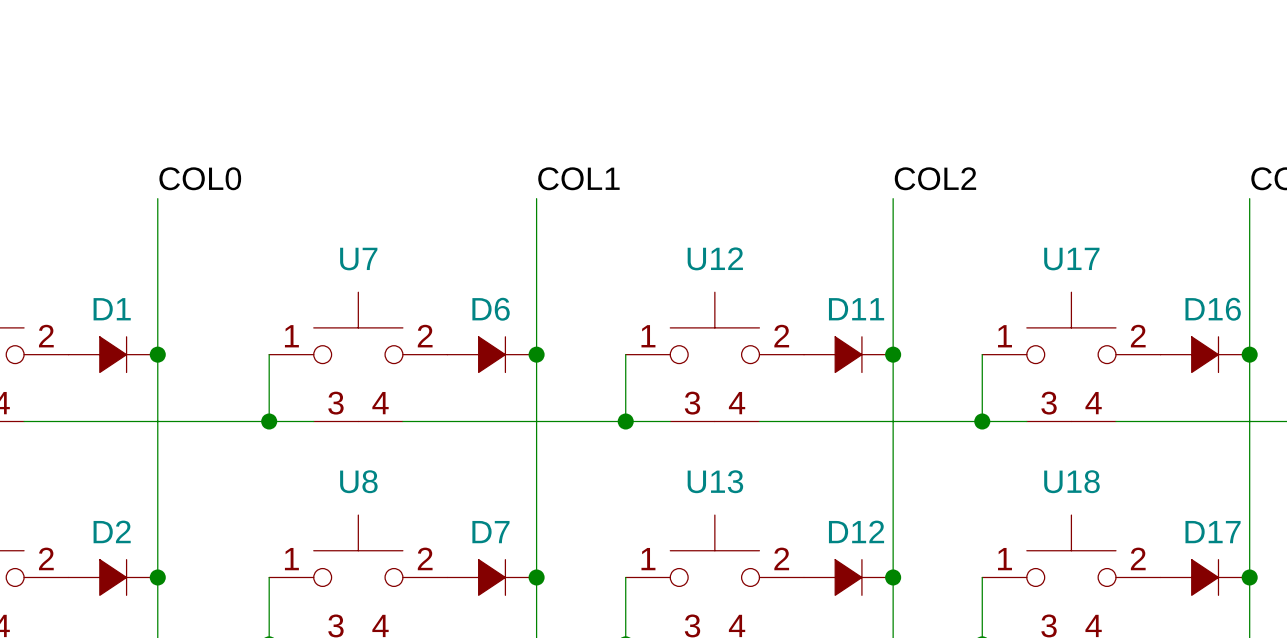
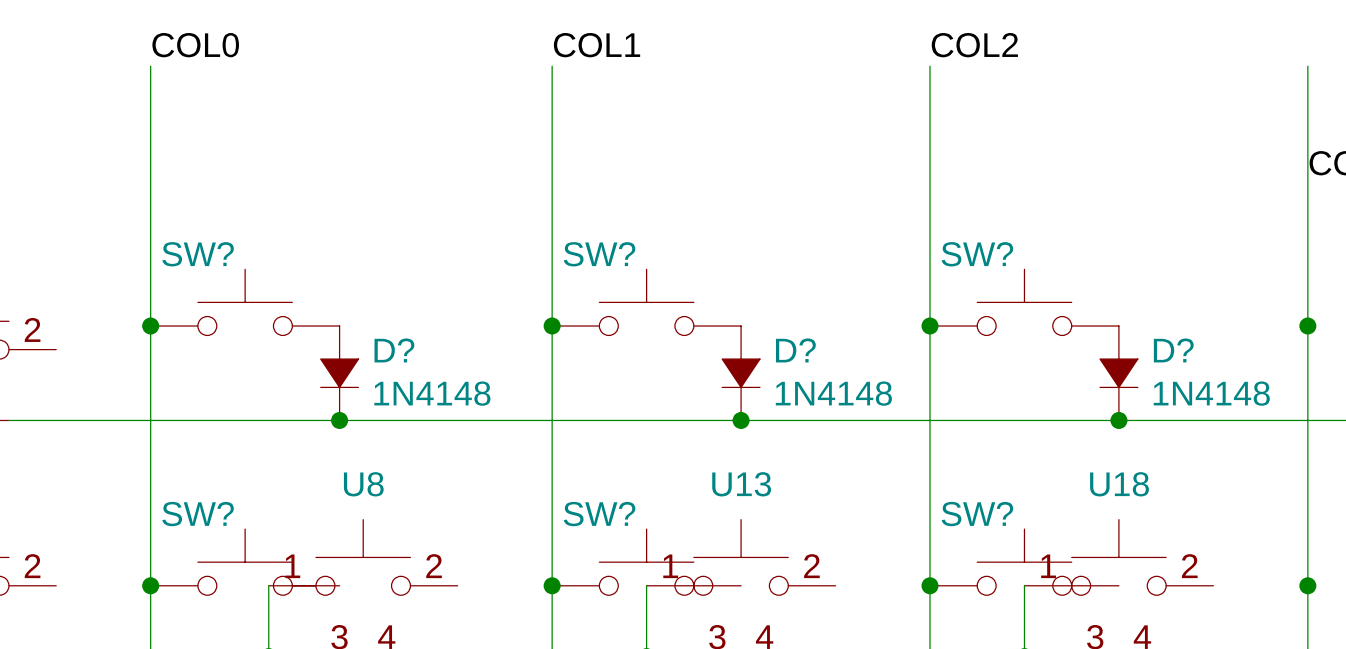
wire: none -> (150, 66) (150, 184)
wire: none -> (552, 66) (552, 184)
wire: none -> (930, 66) (930, 184)
wire: none -> (1307, 66) (1307, 184)
label position: COL0 (200, 178) -> COL0 (195, 45)
label position: COL1 (578, 178) -> COL1 (597, 45)
label position: COL2 (935, 178) -> COL2 (974, 45)
SW?: none -> (245, 302)
SW?: none -> (646, 302)
SW?: none -> (1024, 302)
D1: (113, 354) -> none
junction position: (157, 354) -> (150, 326)
wire: (269, 354) (269, 421) -> none
D6: (492, 354) -> none
junction position: (536, 354) -> (552, 326)
wire: (625, 354) (625, 421) -> none
D11: (848, 354) -> none
junction position: (893, 354) -> (930, 326)
wire: (982, 354) (982, 421) -> none
D16: (1205, 354) -> none
junction position: (1249, 354) -> (1307, 326)
U7: (358, 356) -> none
U12: (714, 356) -> none
U17: (1071, 356) -> none
D?: none -> 1N4148 (339, 373)
D?: none -> 1N4148 (741, 373)
D?: none -> 1N4148 (1118, 373)
junction position: (269, 421) -> (339, 420)
junction: (625, 421) -> none
junction: none -> (741, 420)
junction: (982, 421) -> none
junction: none -> (1118, 420)
SW?: none -> (245, 562)
SW?: none -> (646, 562)
SW?: none -> (1024, 562)
D2: (113, 577) -> none
D7: (492, 577) -> none
D12: (848, 577) -> none
D17: (1205, 577) -> none

